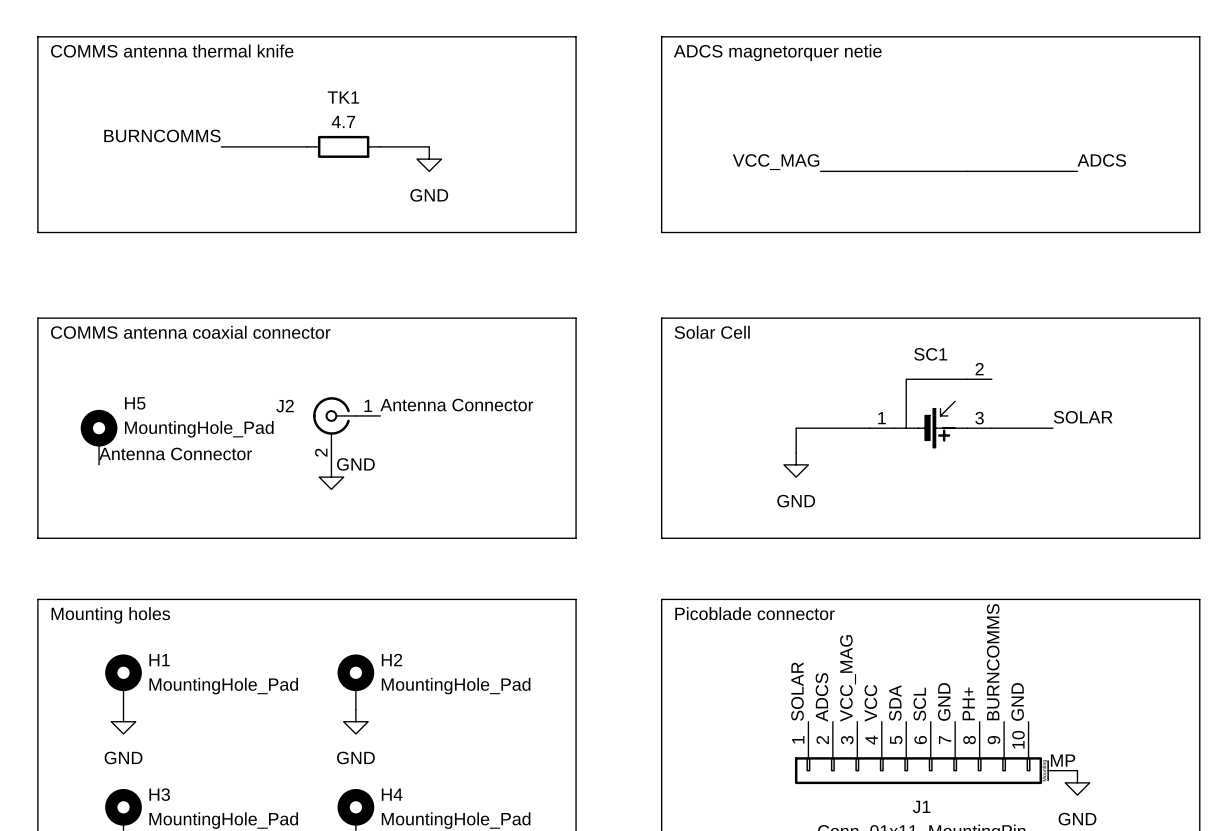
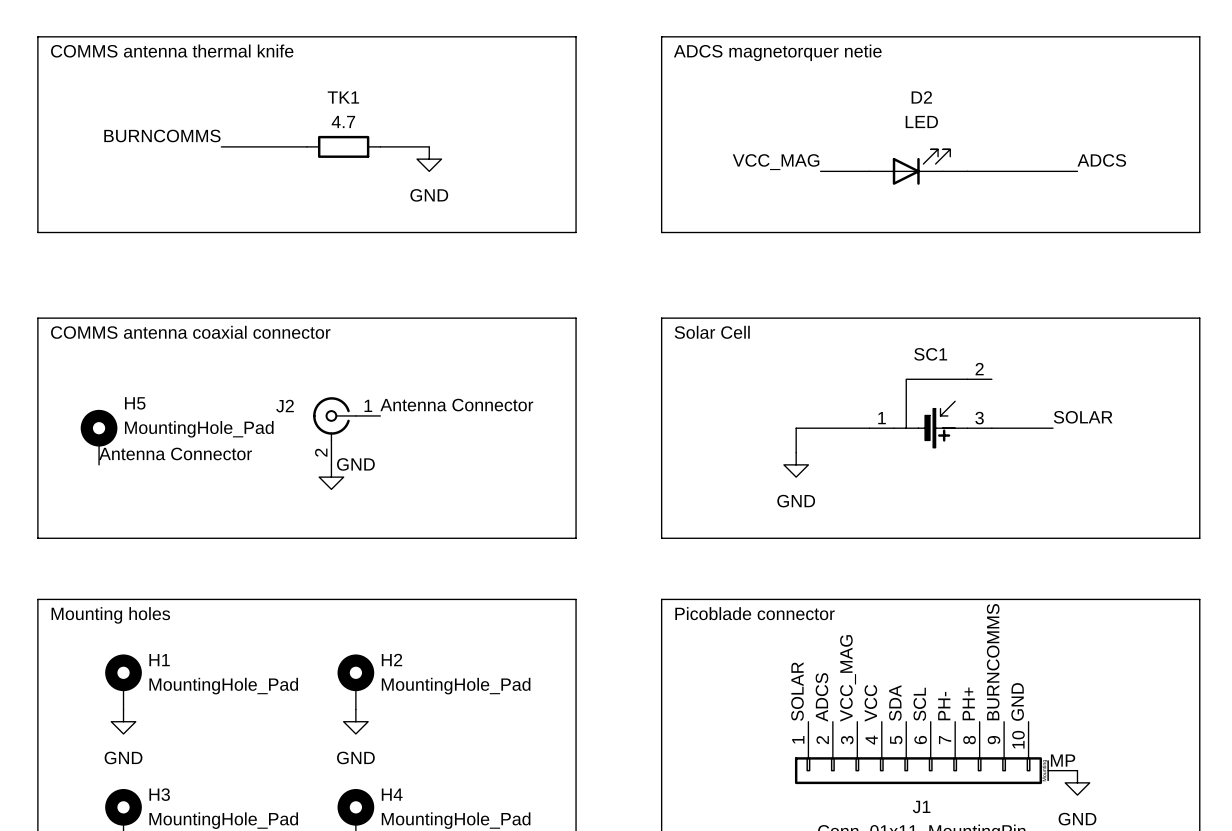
D2: none -> LED (909, 167)
label: GND (944, 701) -> PH- (944, 706)

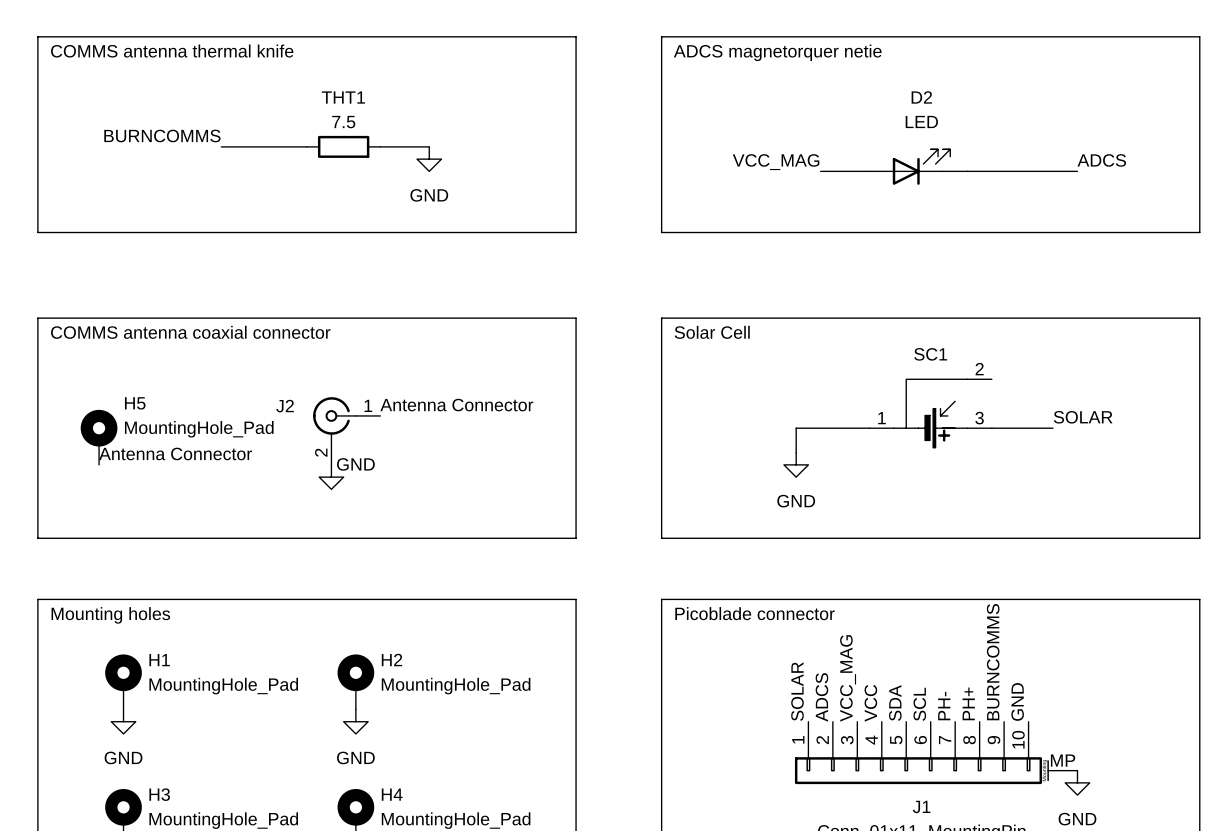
TK1 name: TK1 (343, 97) -> THT1 (343, 97)
TK1 value: 4.7 (343, 121) -> 7.5 (343, 122)

